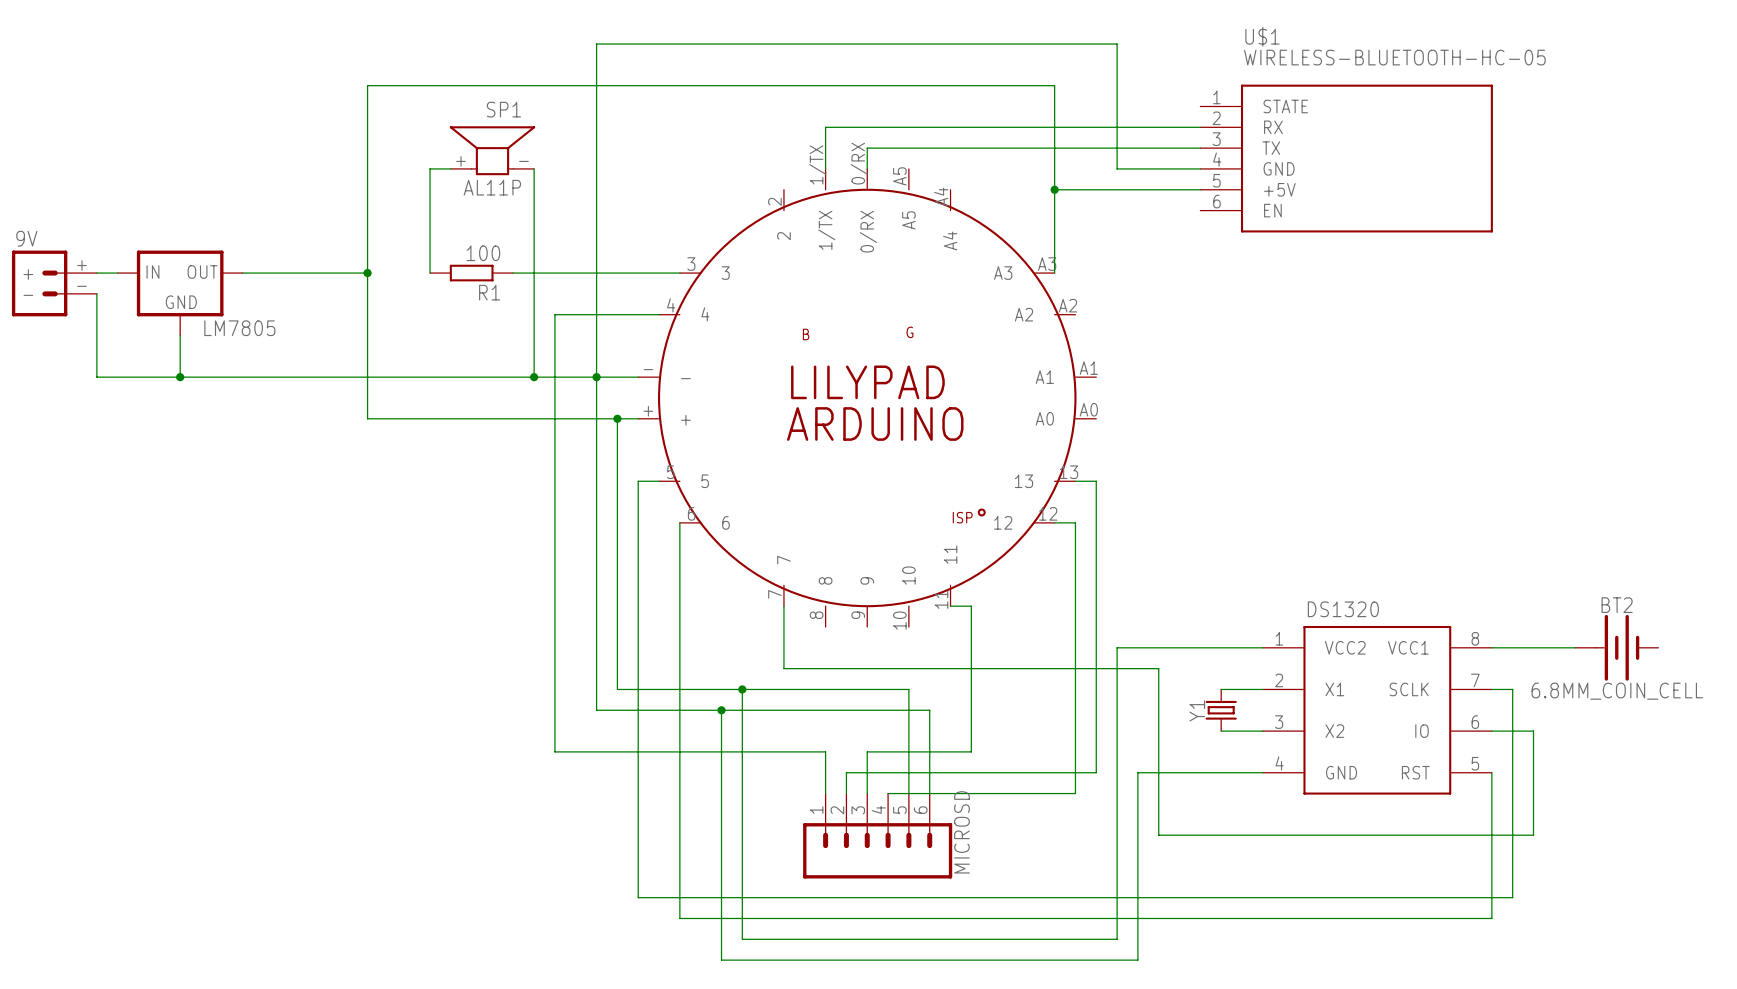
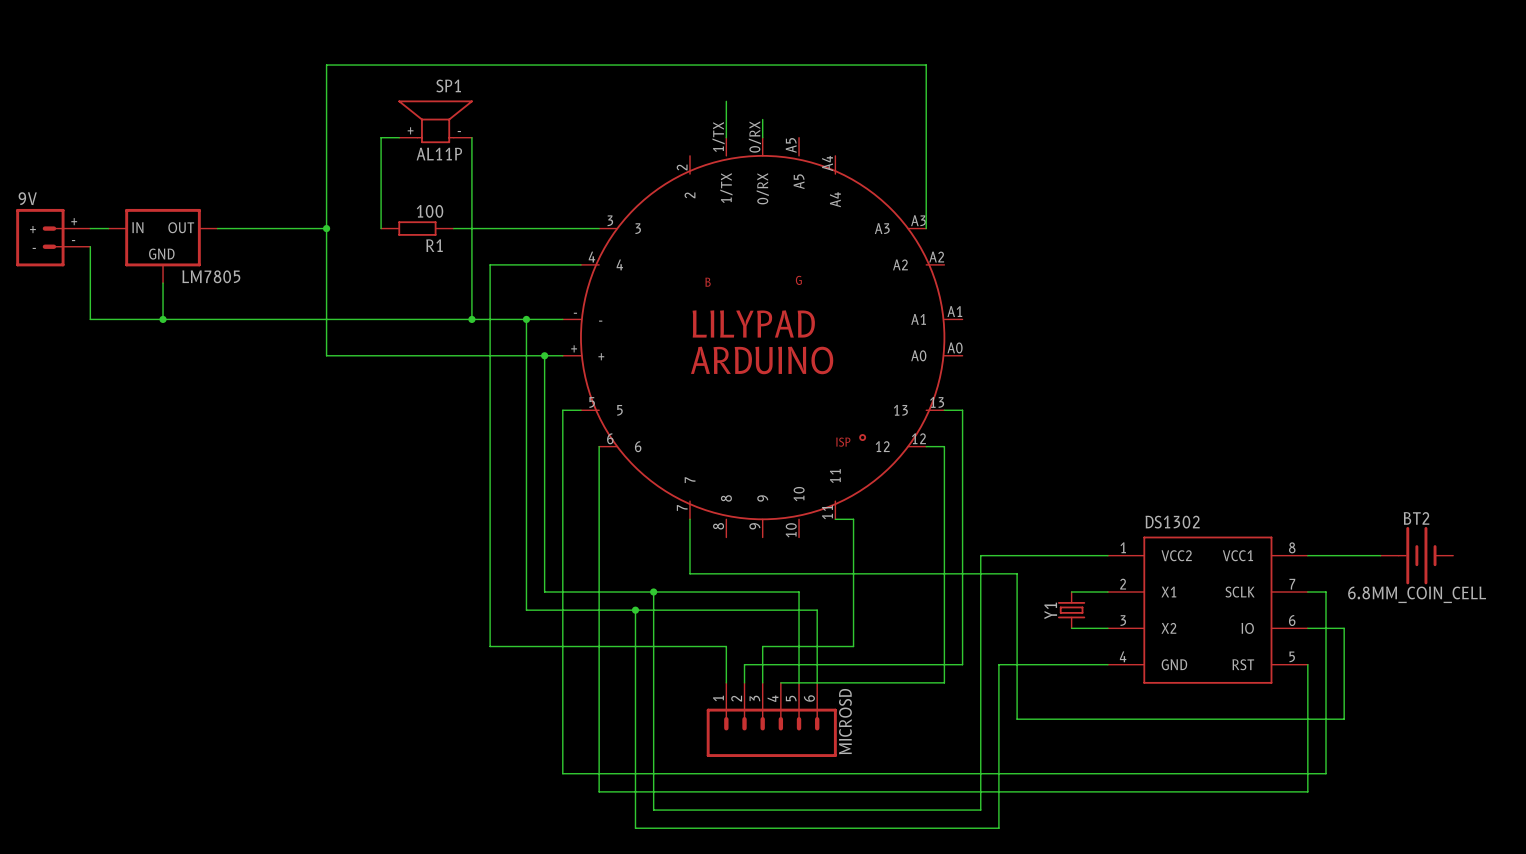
wire: (825, 127) (1200, 127) -> none
wire: (867, 148) (1200, 148) -> none
U$1: WIRELESS-BLUETOOTH-HC-05 (1346, 158) -> none
wire: (1200, 168) (1117, 168) (1117, 44) (596, 44) (596, 377) -> none
wire: (1054, 189) (1200, 189) -> none
junction: (1054, 189) -> none
DS1320 name: DS1320 (1343, 609) -> DS1302 (1172, 522)

